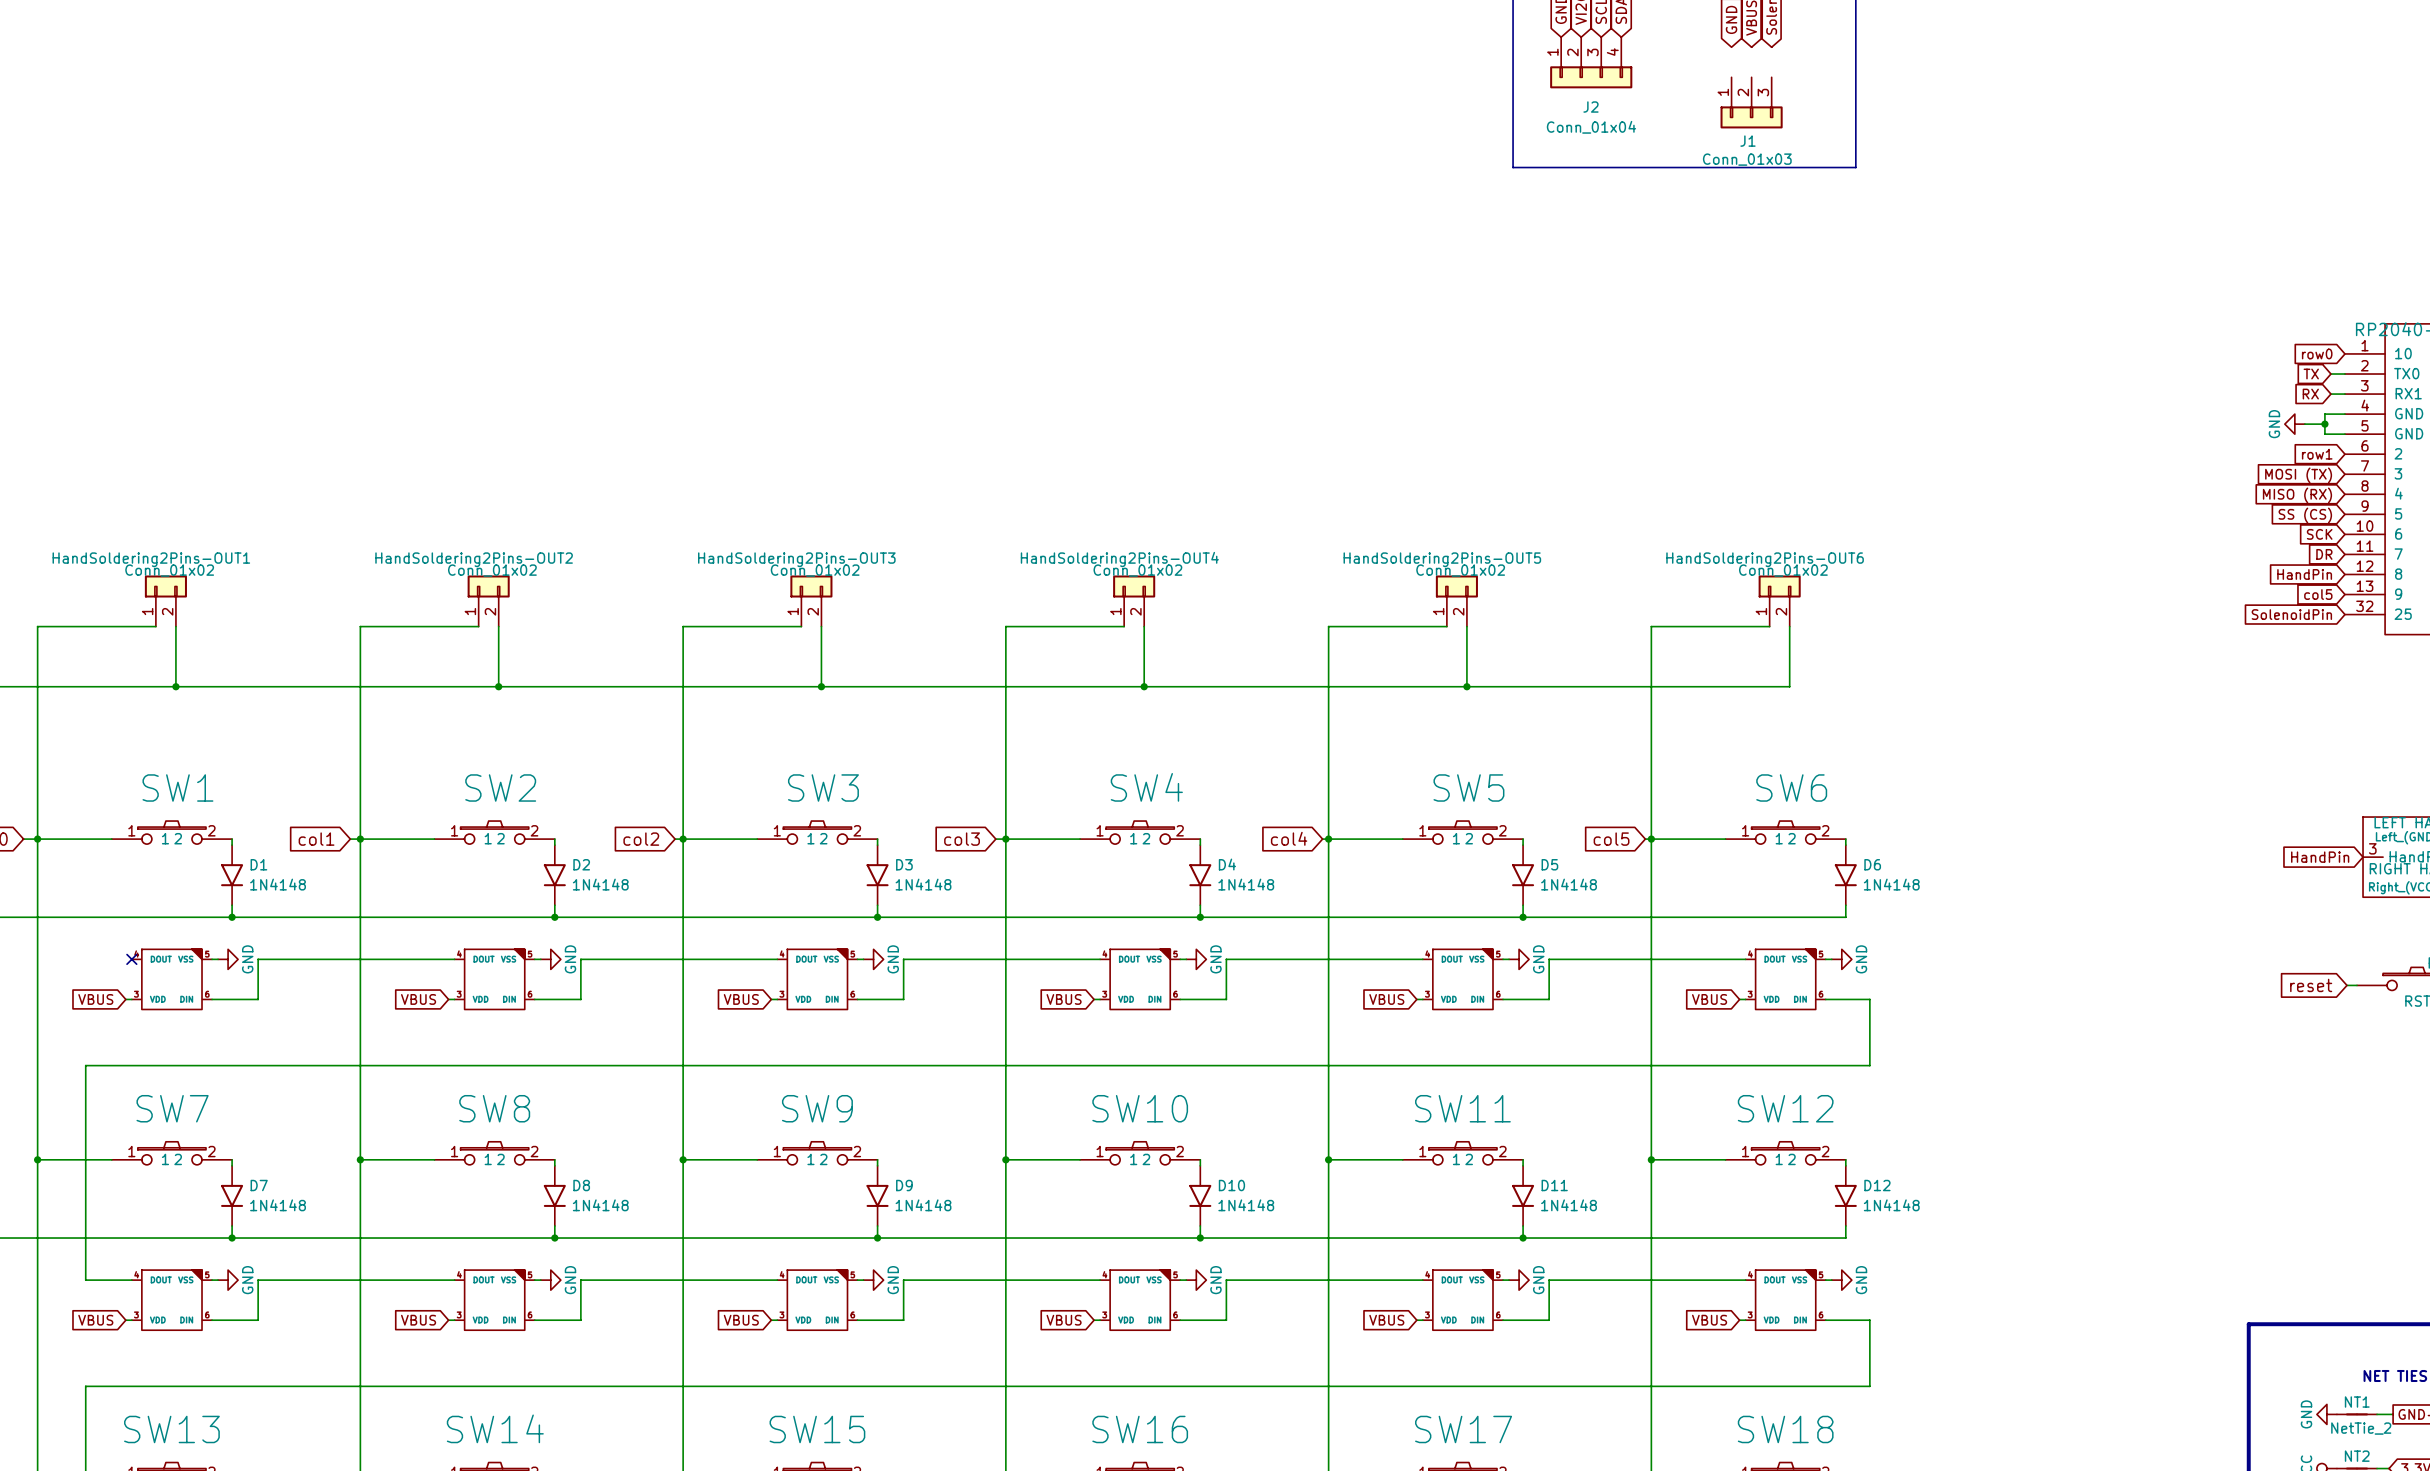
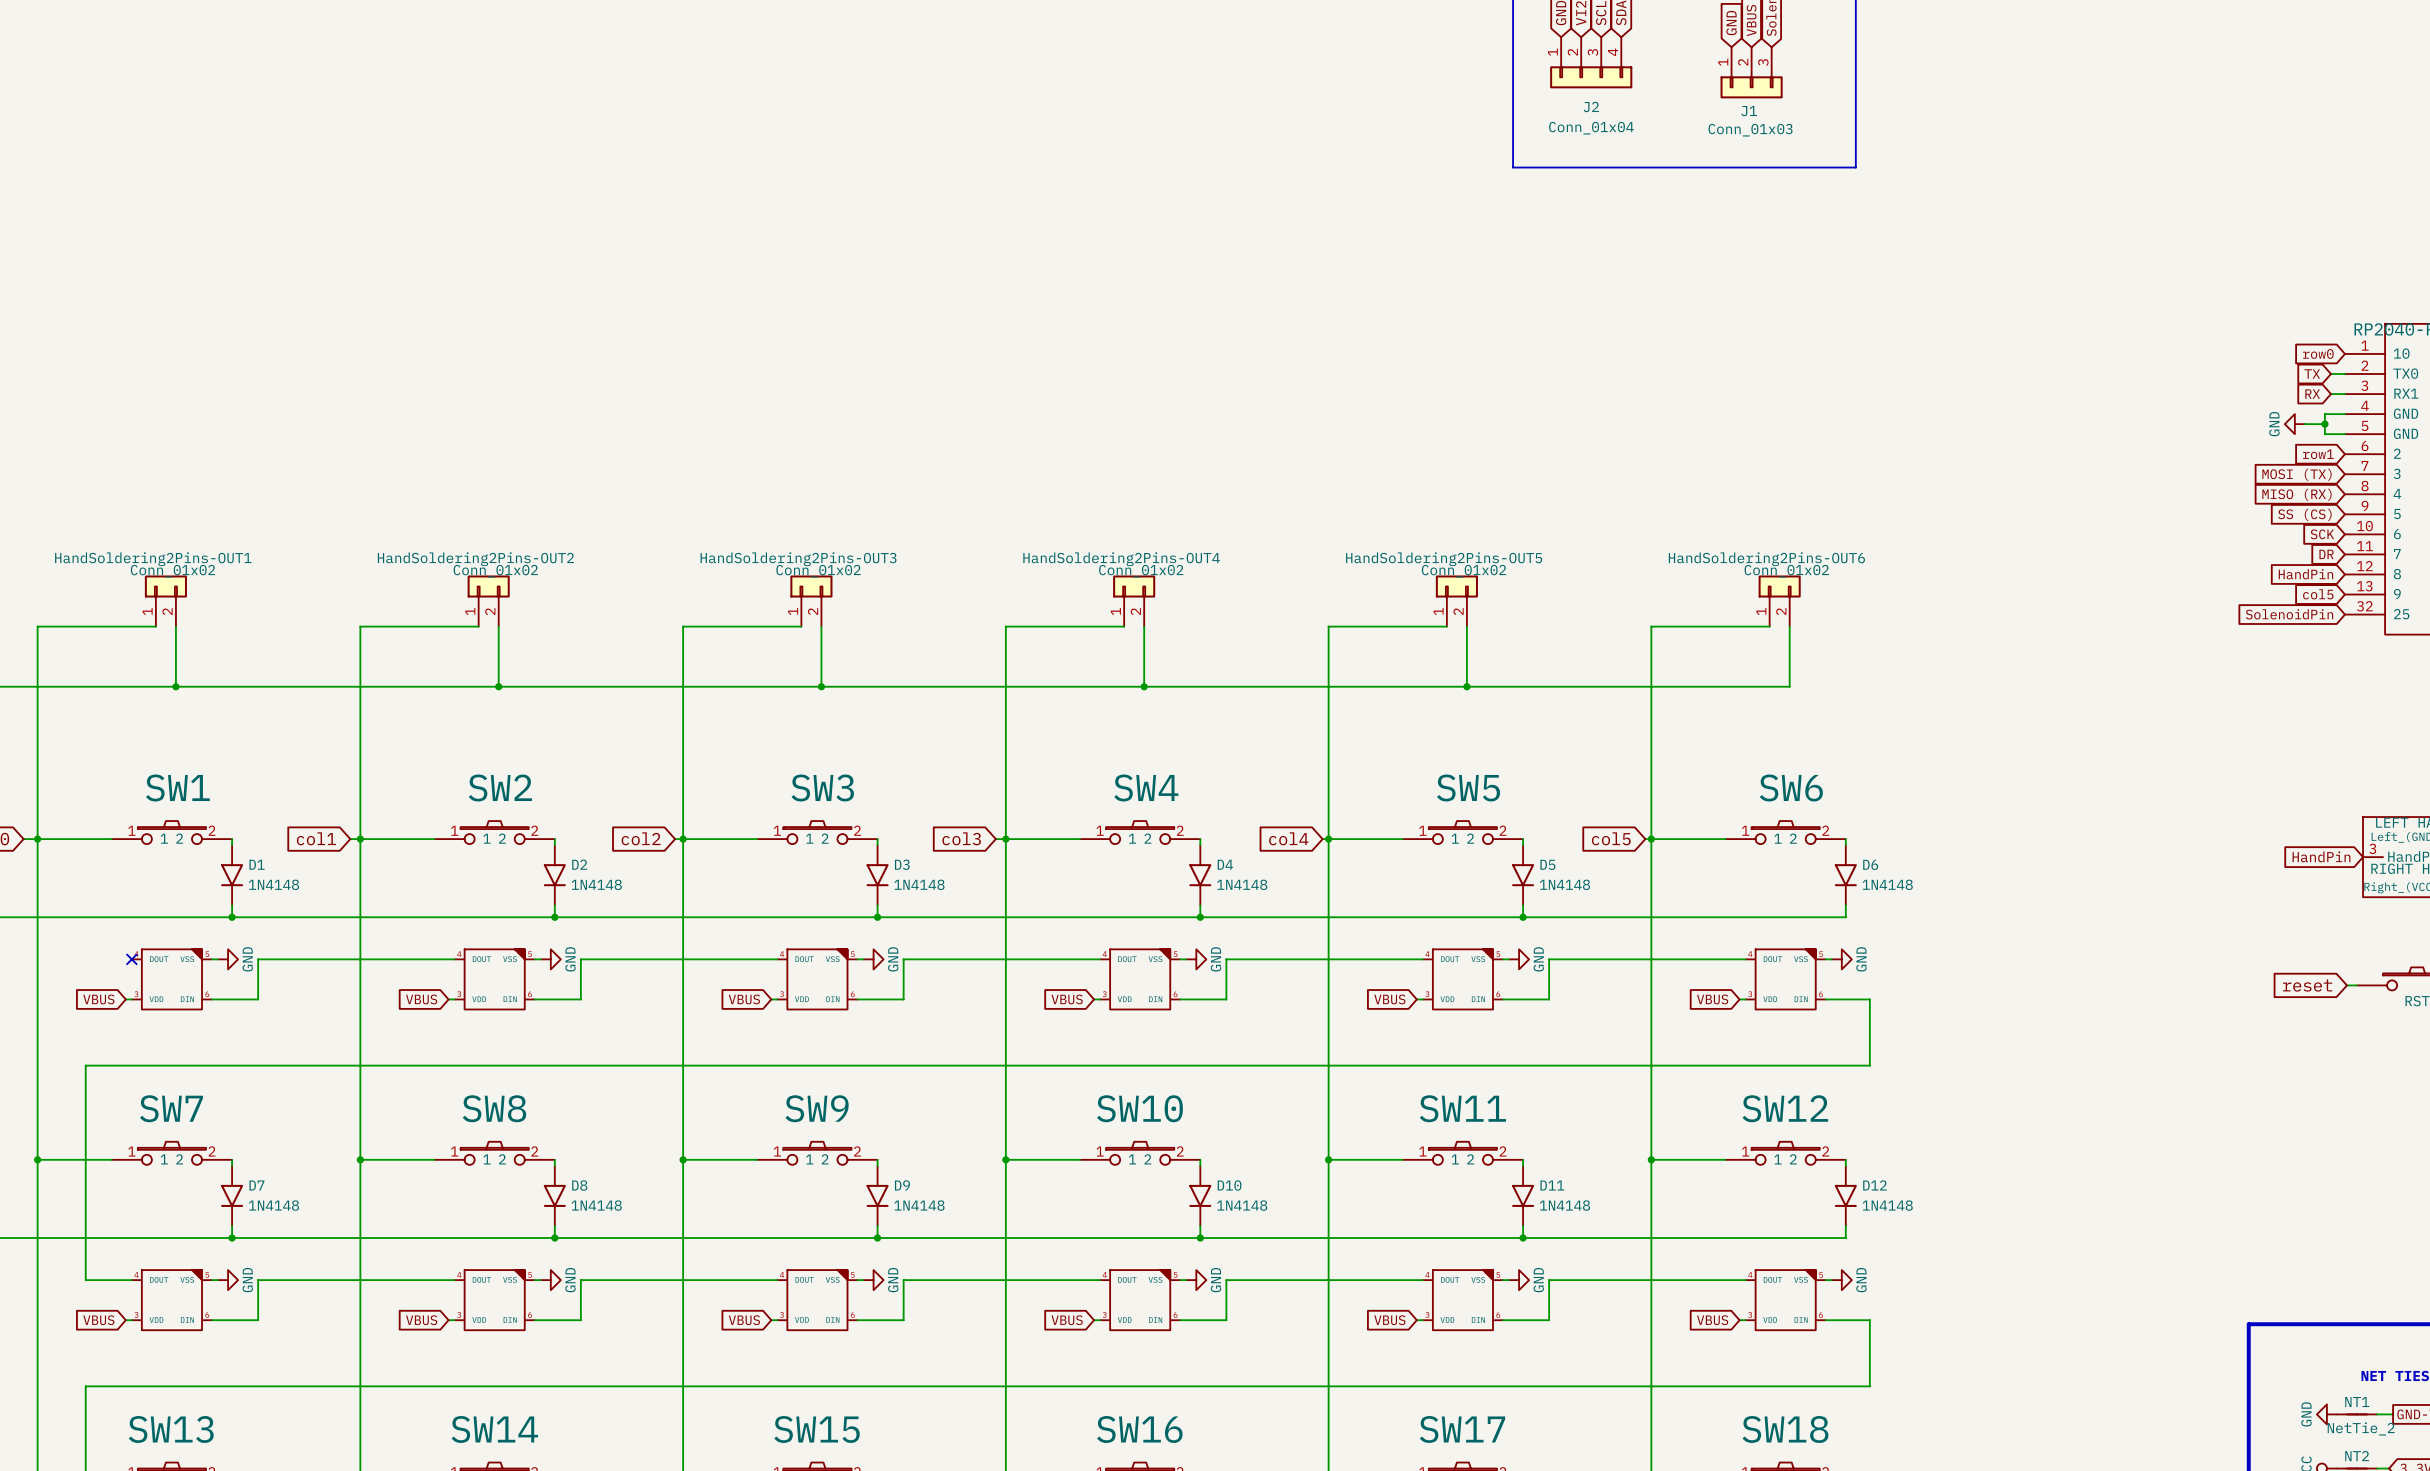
J1 position: (1751, 102) -> (1751, 72)

